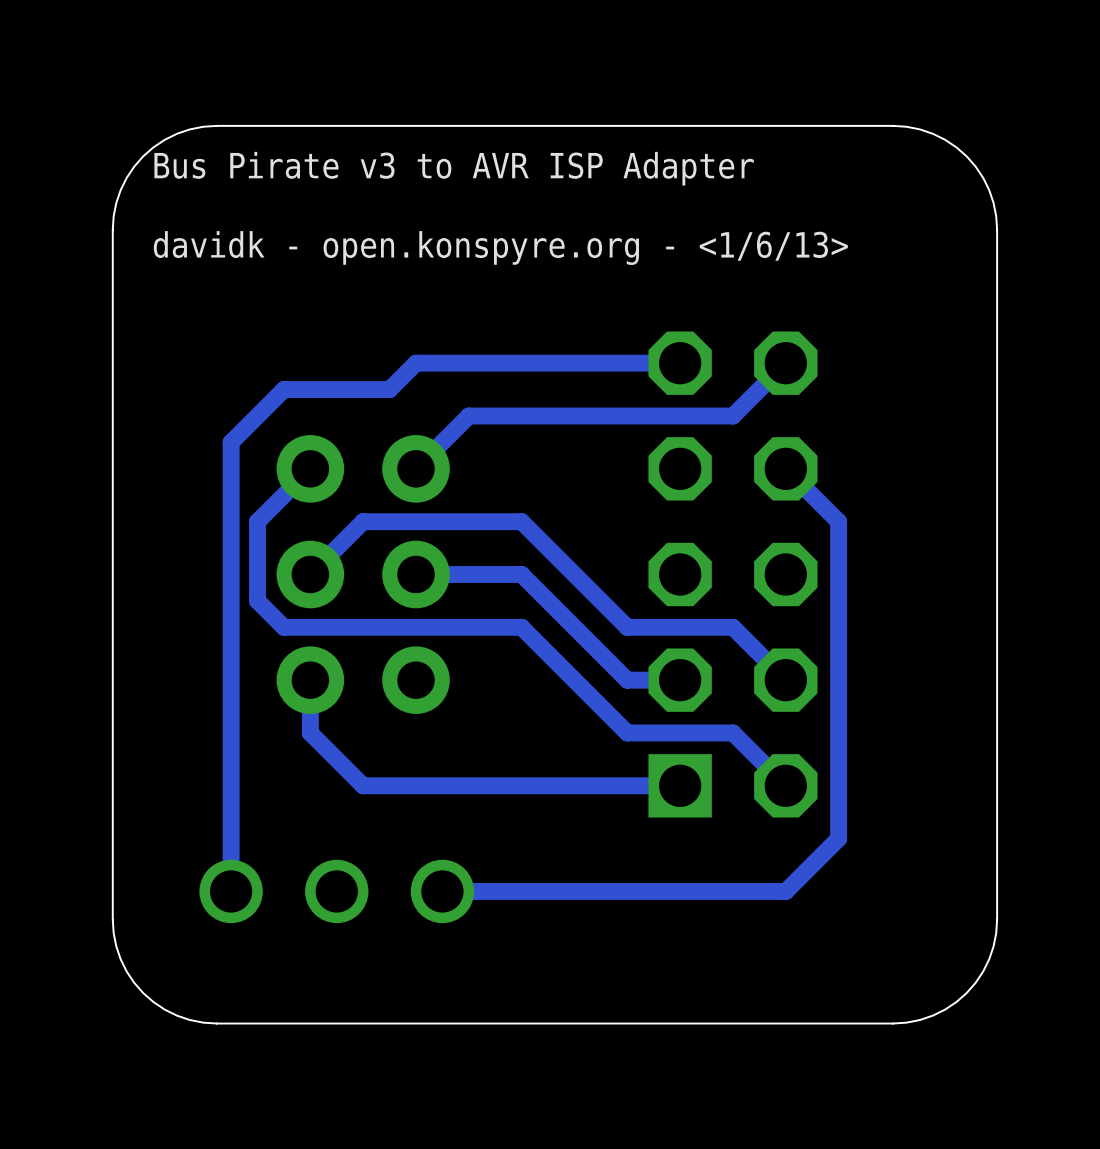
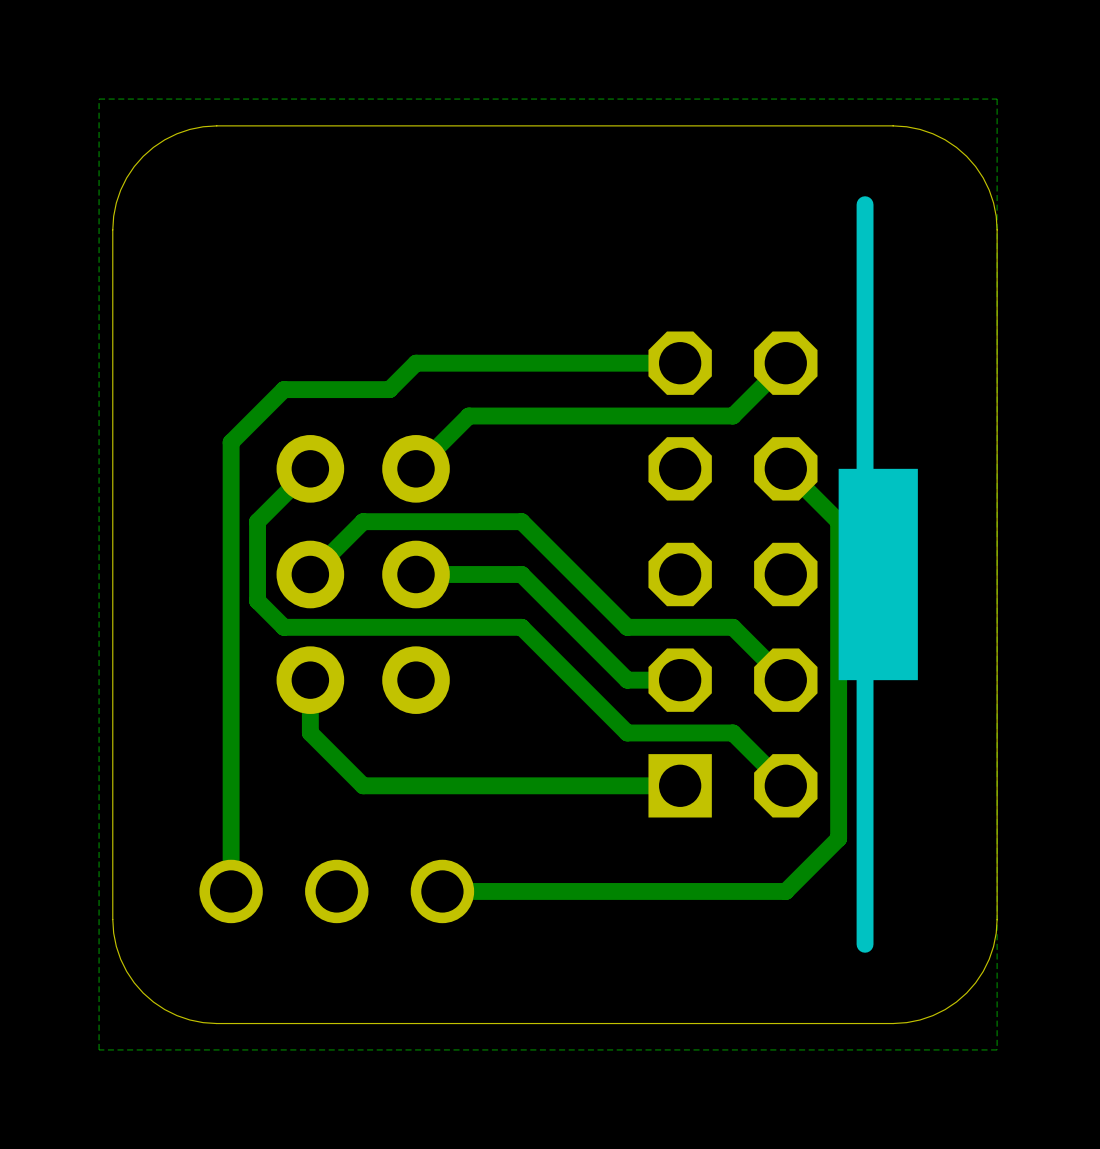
zone outline: none -> (997, 99) (997, 1049) (99, 1049) (99, 99) (997, 99)
text: Bus Pirate v3 to AVR ISP Adapter (454, 168) -> none
line: none -> (865, 204) (865, 468)
text: davidk - open.konspyre.org - <1/6/13> (500, 248) -> none
drawing: none -> [838, 468, 918, 681]
line: none -> (865, 680) (865, 944)

